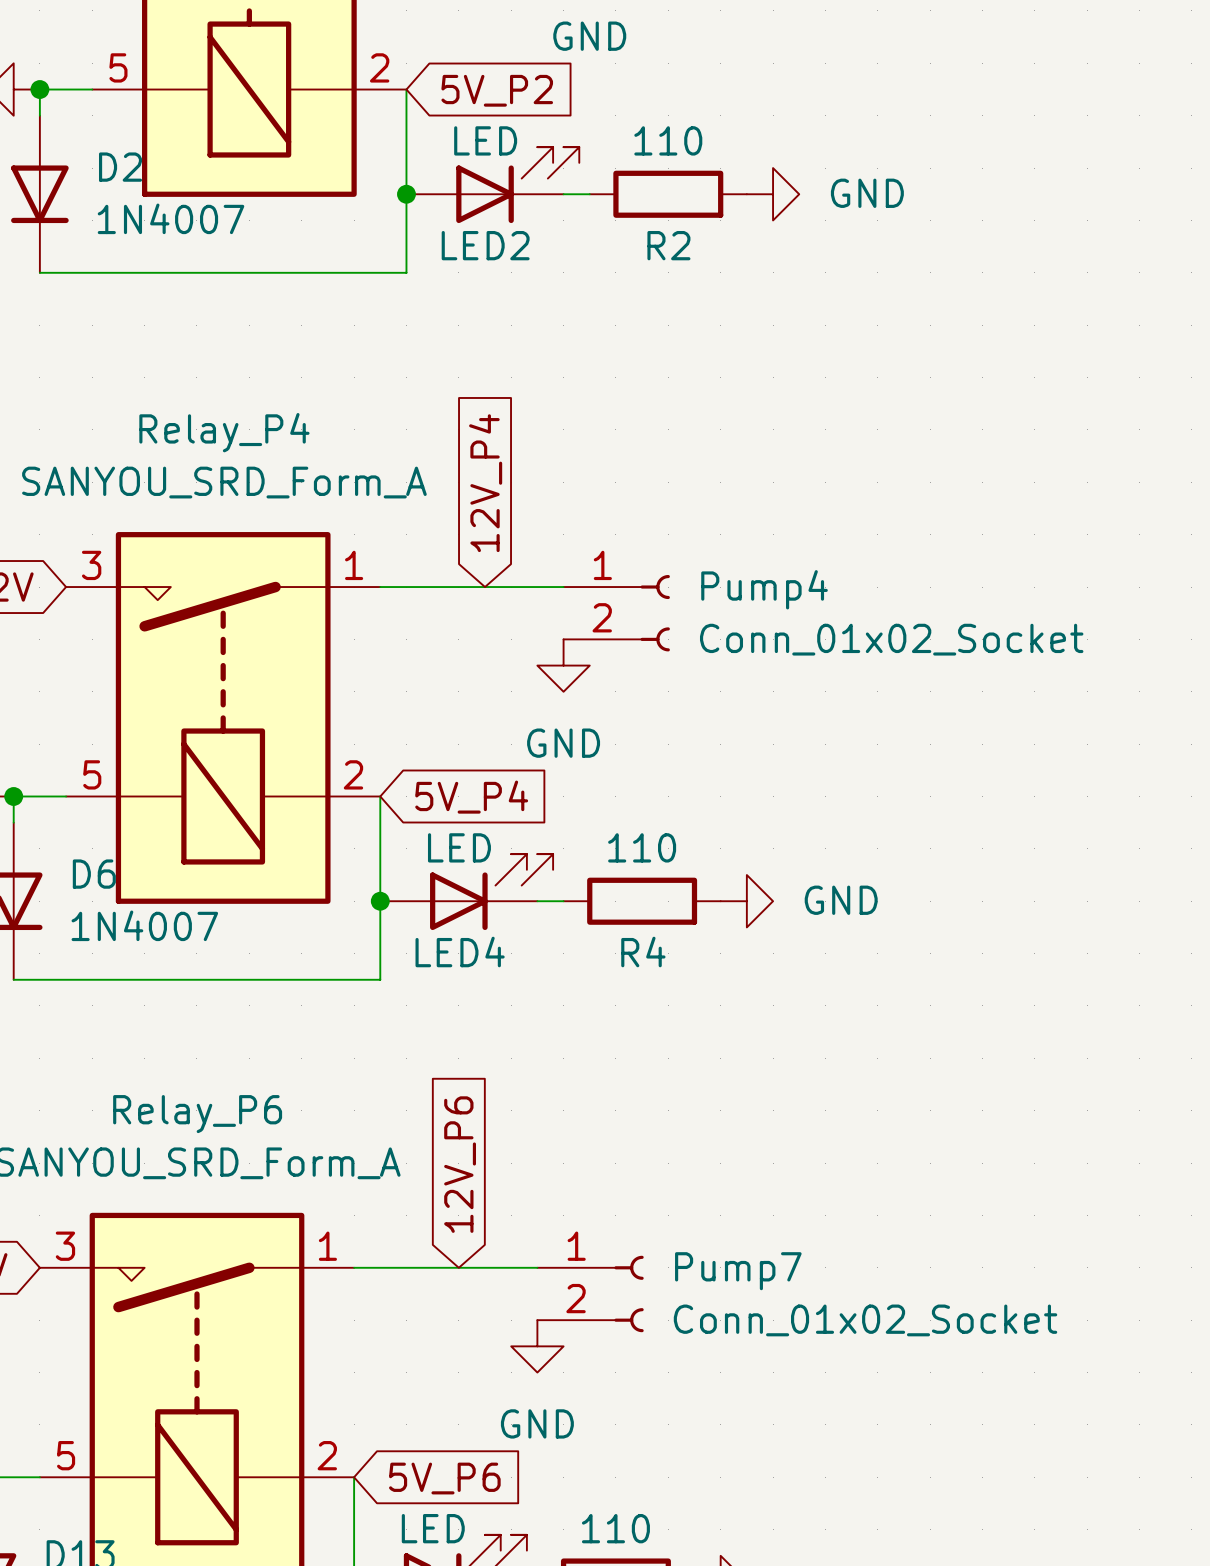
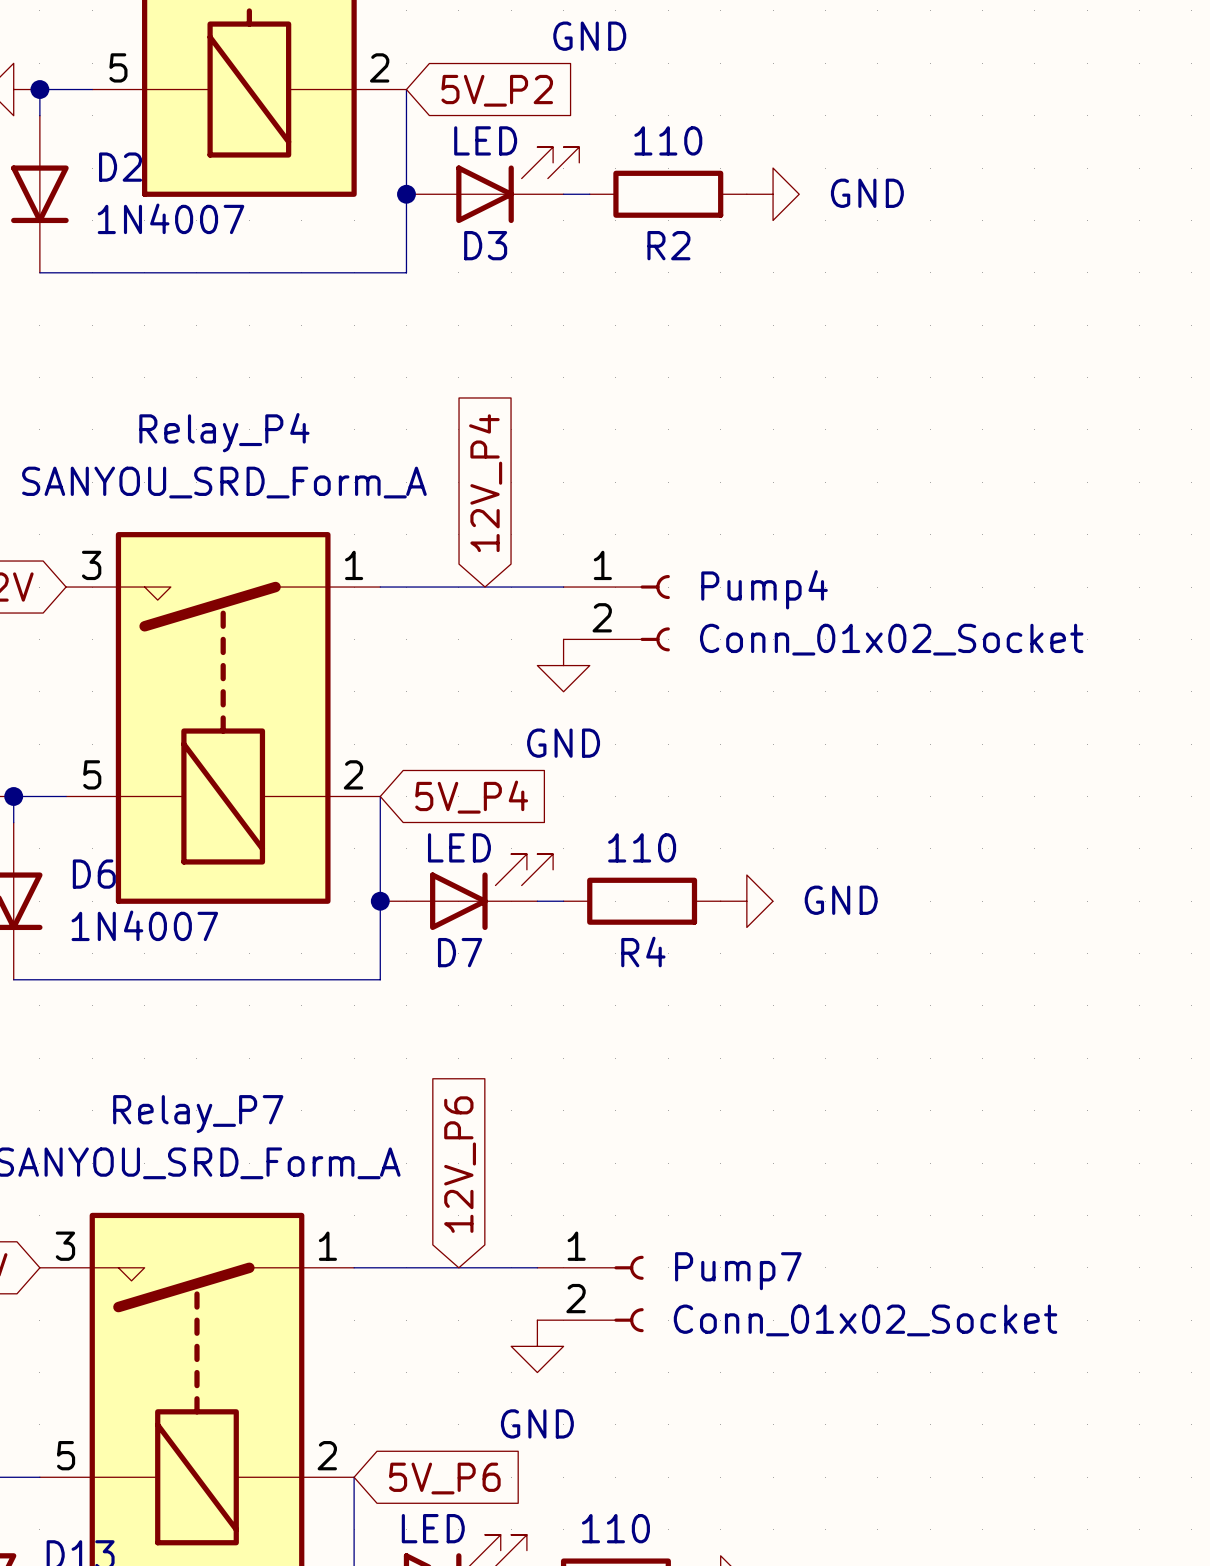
LED2 name: LED2 (485, 245) -> D3 (485, 245)
LED4 name: LED4 (460, 951) -> D7 (460, 952)
Relay_P6 name: Relay_P6 (197, 1114) -> Relay_P7 (198, 1114)

